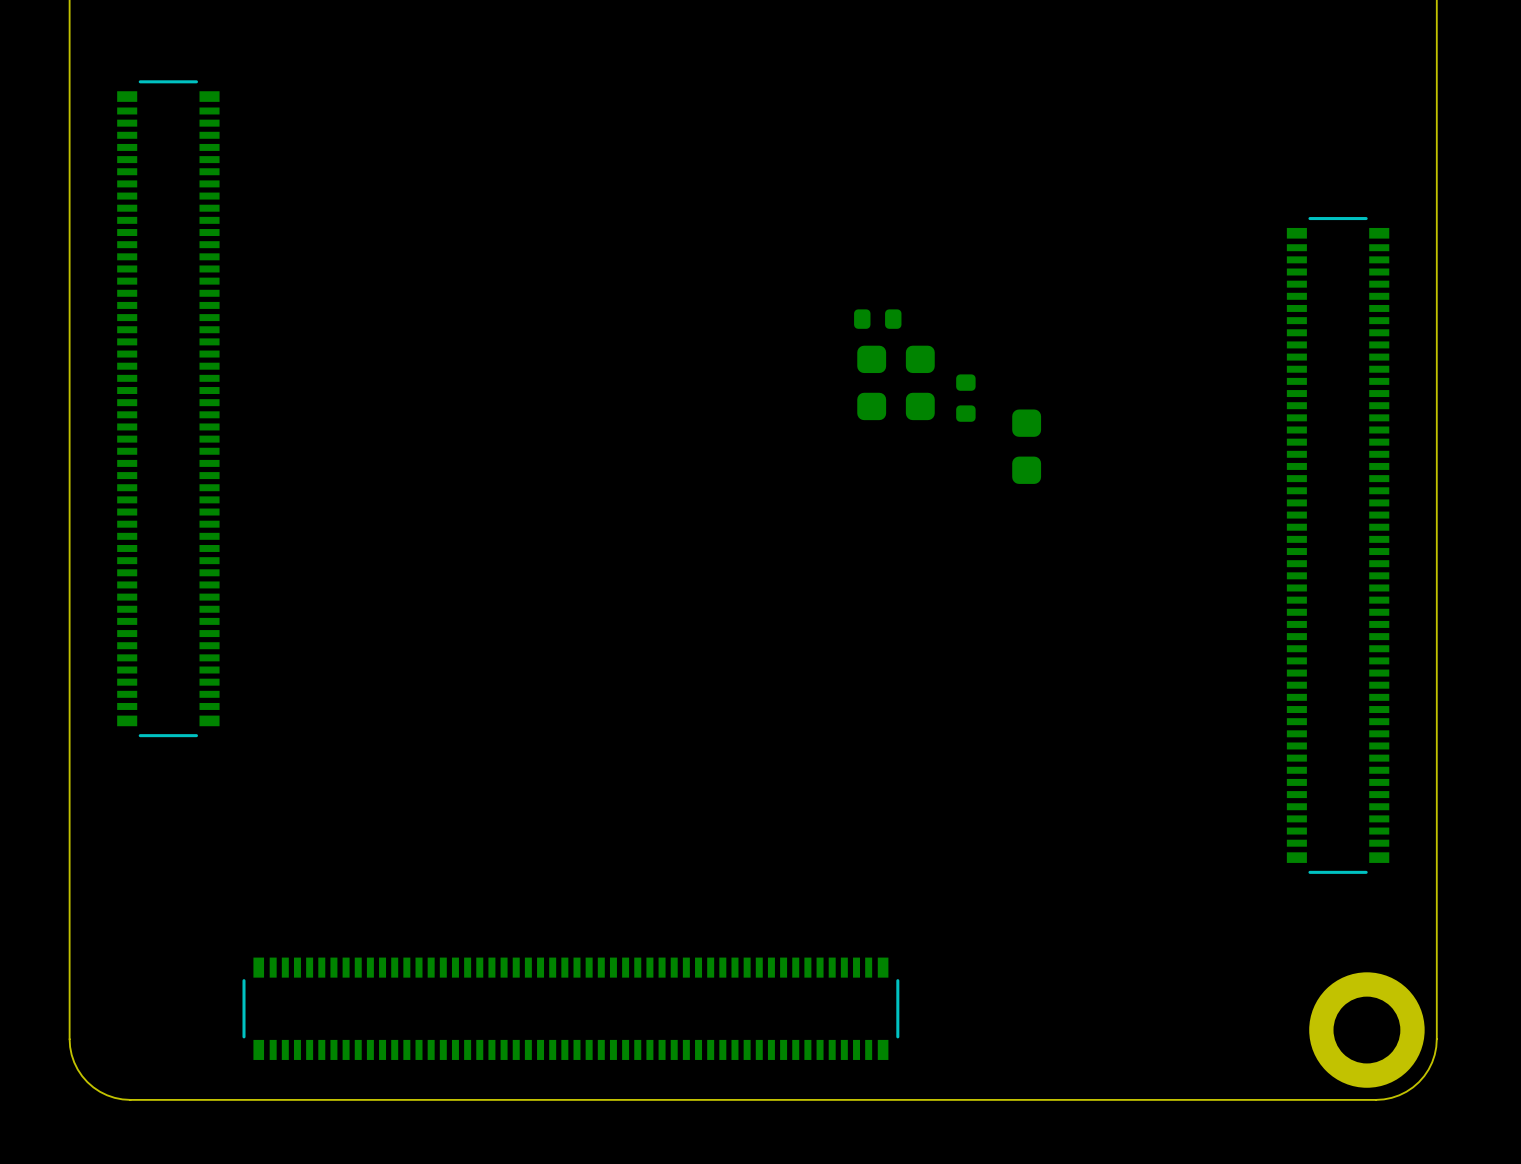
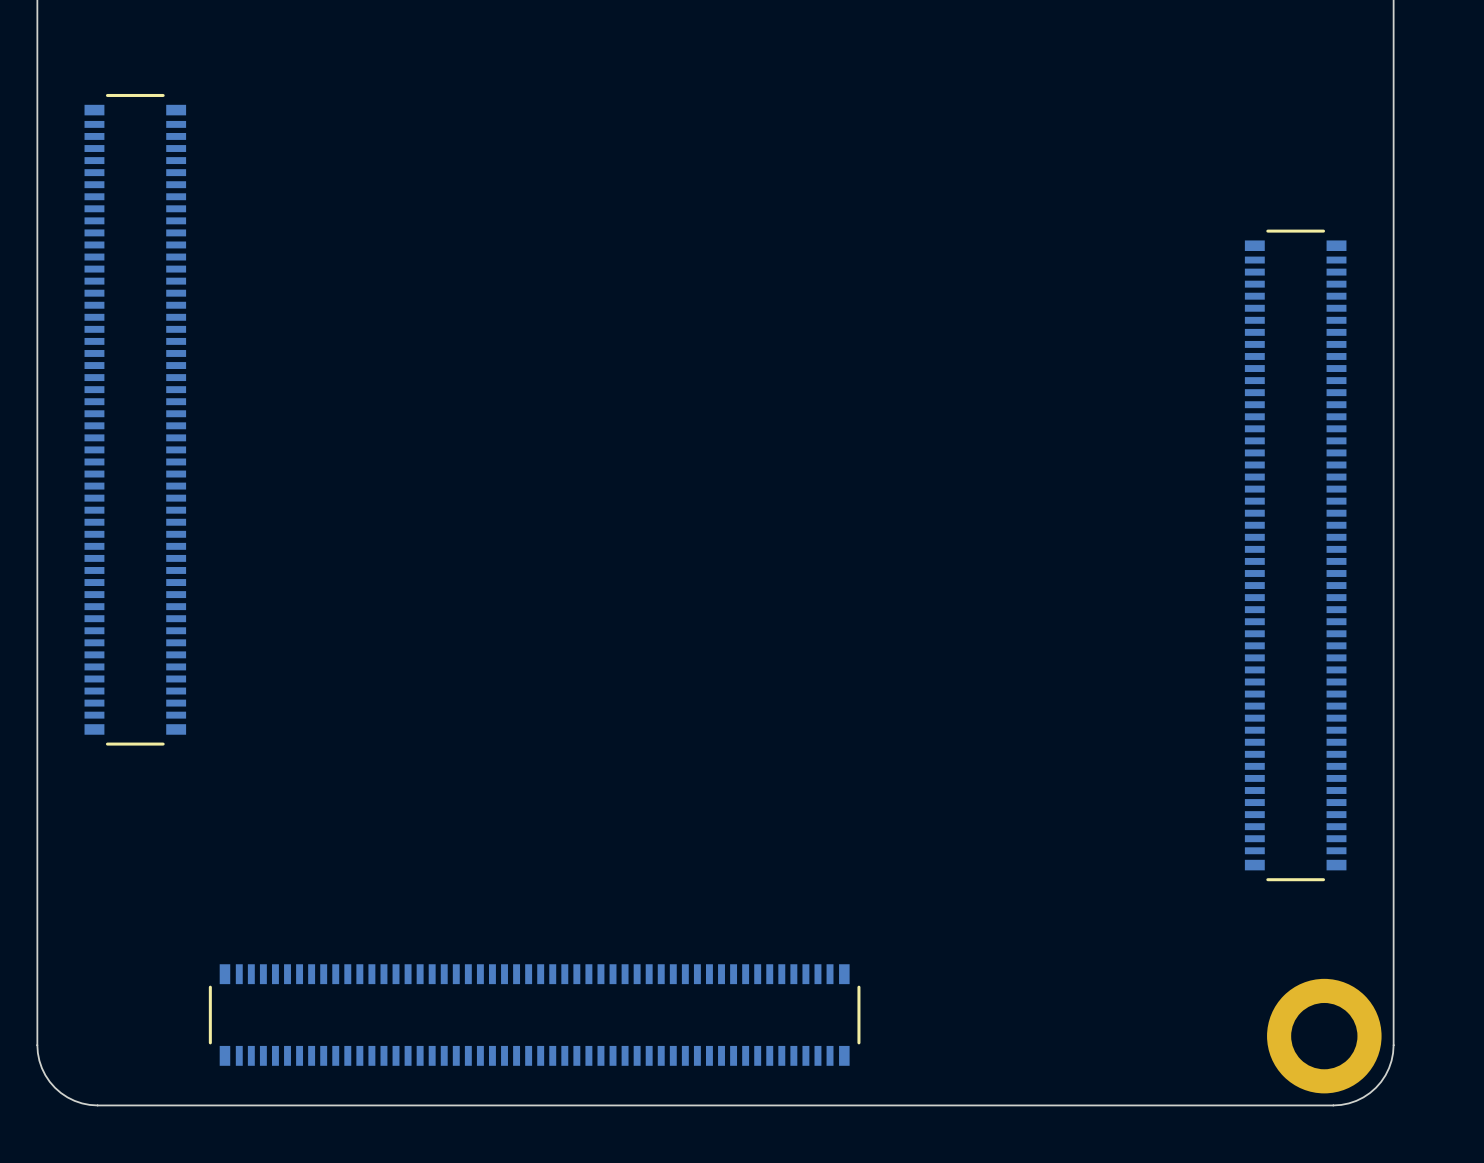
part: (877, 319) -> none
part: (871, 382) -> none
part: (920, 382) -> none
part: (965, 398) -> none
part: (1026, 446) -> none

